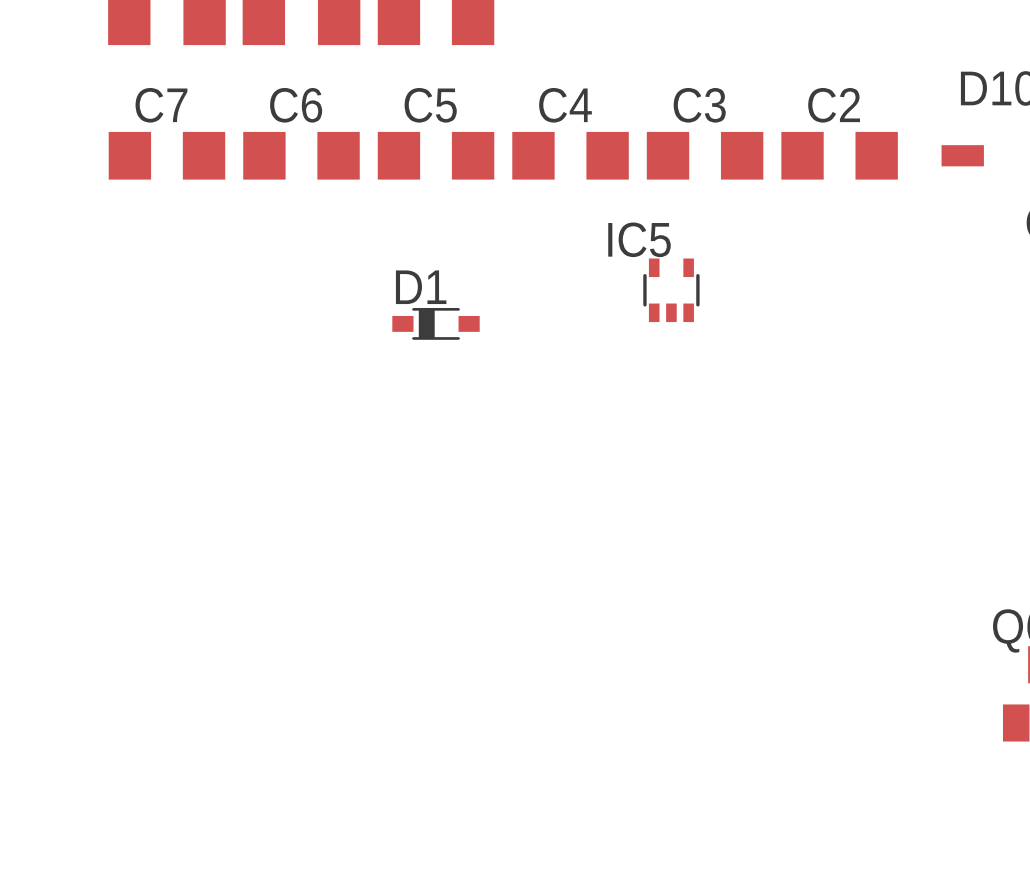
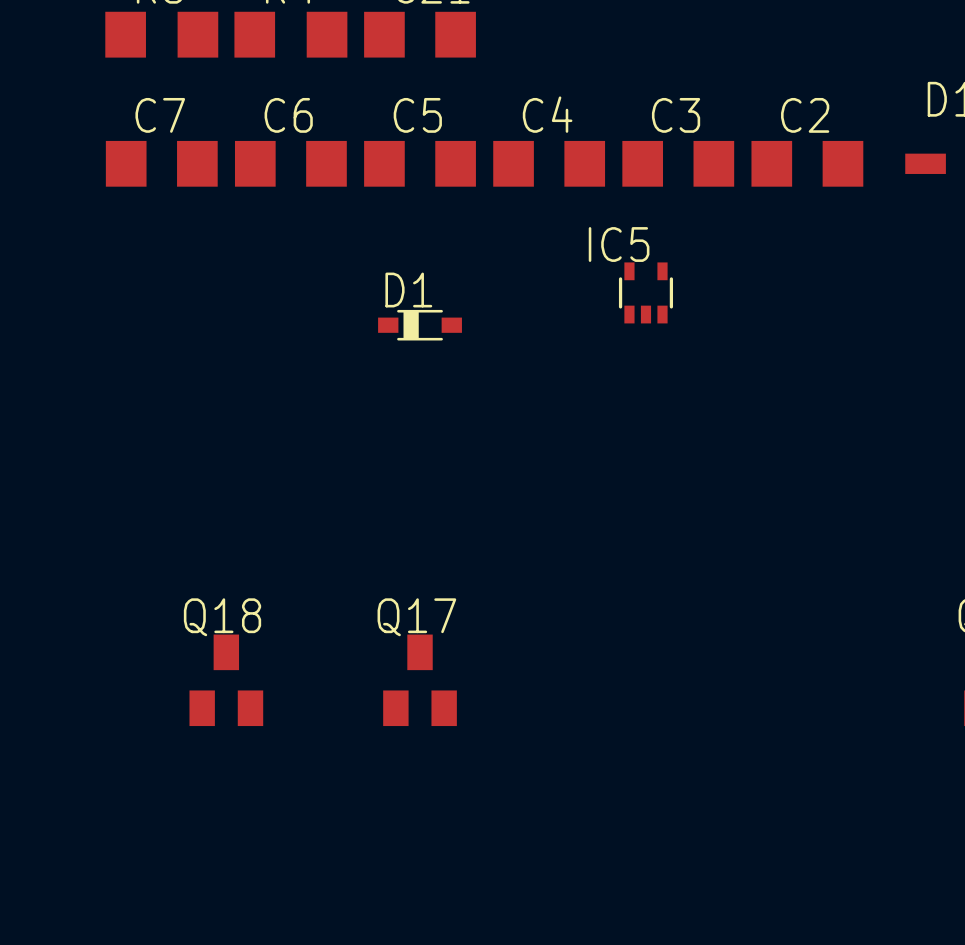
Q18: none -> (226, 680)
Q17: none -> (420, 680)

